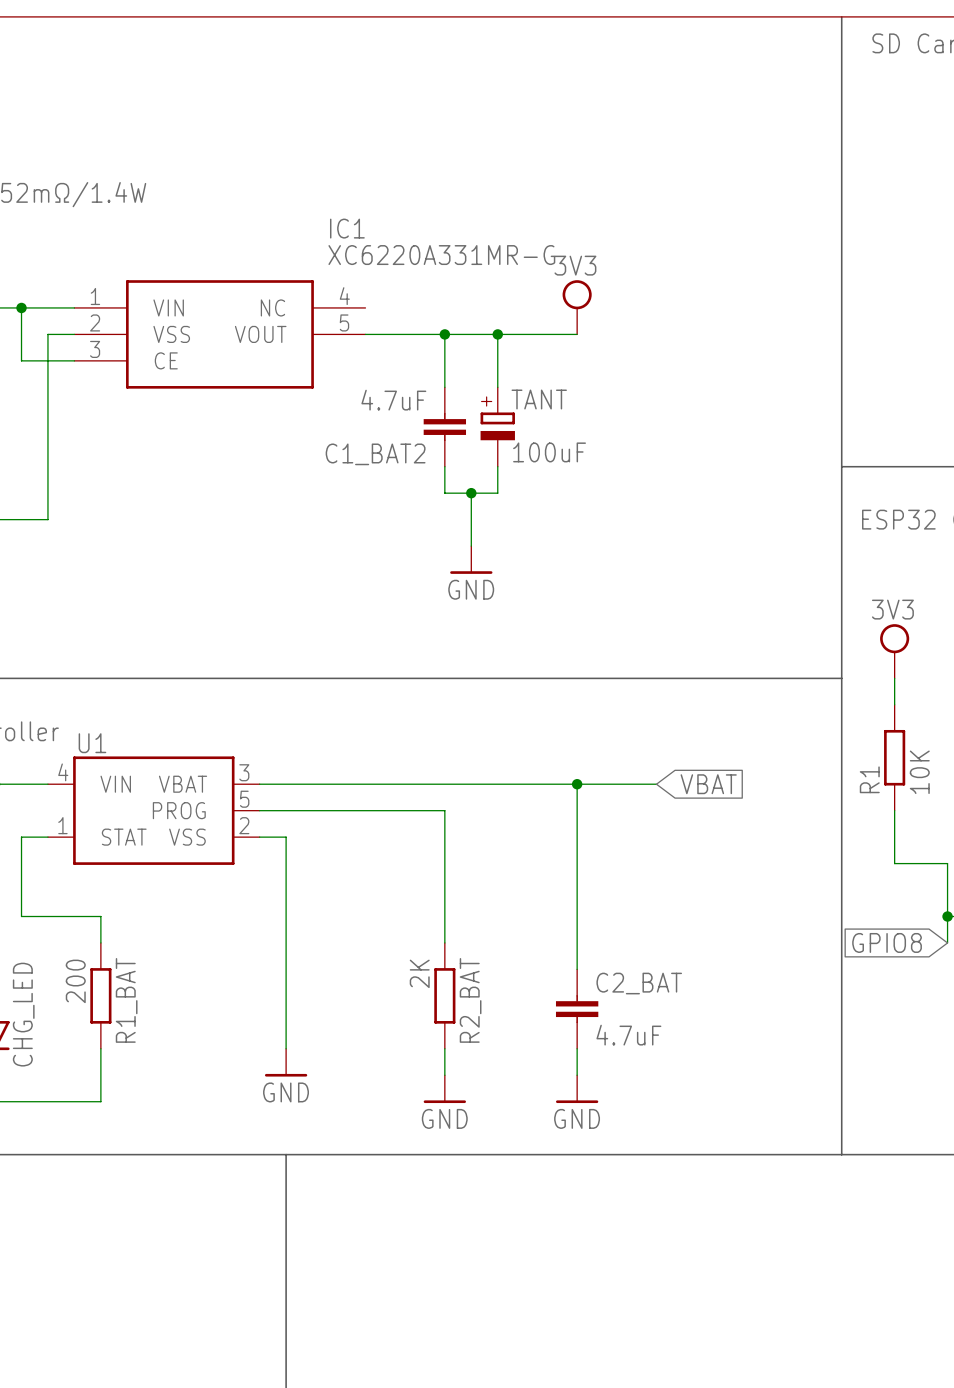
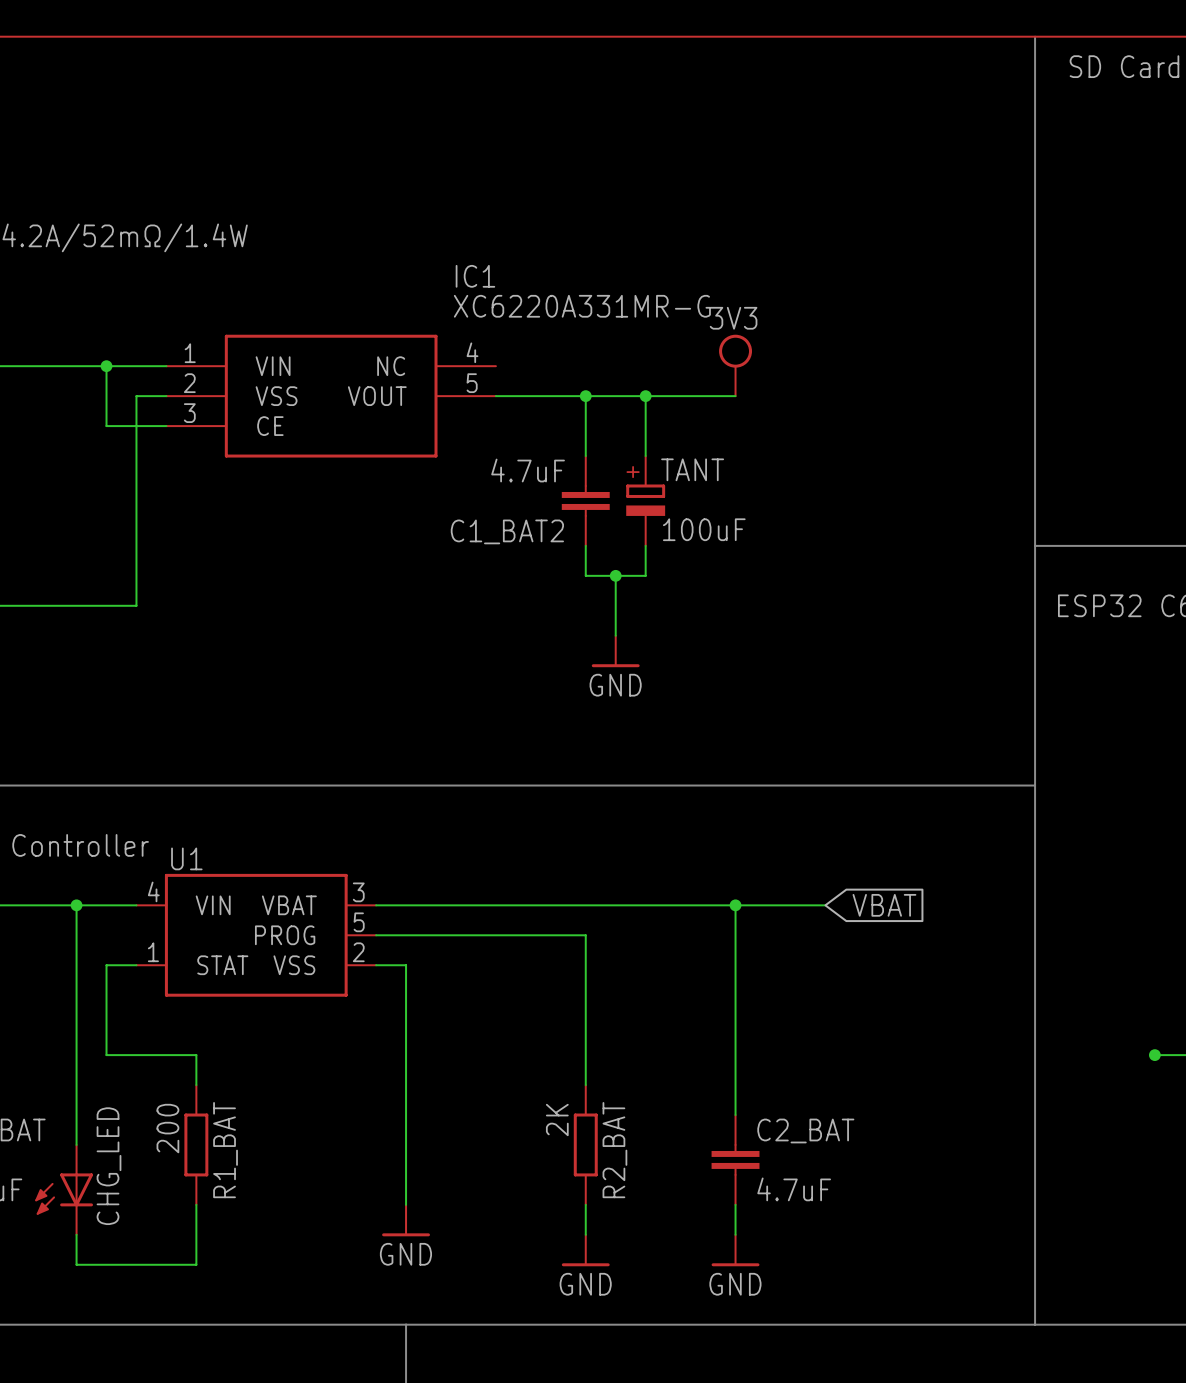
power symbol: 3V3 (894, 651) -> none
wire: (894, 678) (894, 704) -> none
R1: 10K (894, 757) -> none
wire: (894, 810) (894, 863) (947, 863) (947, 942) -> none
global label: GPIO8 (887, 942) -> none

